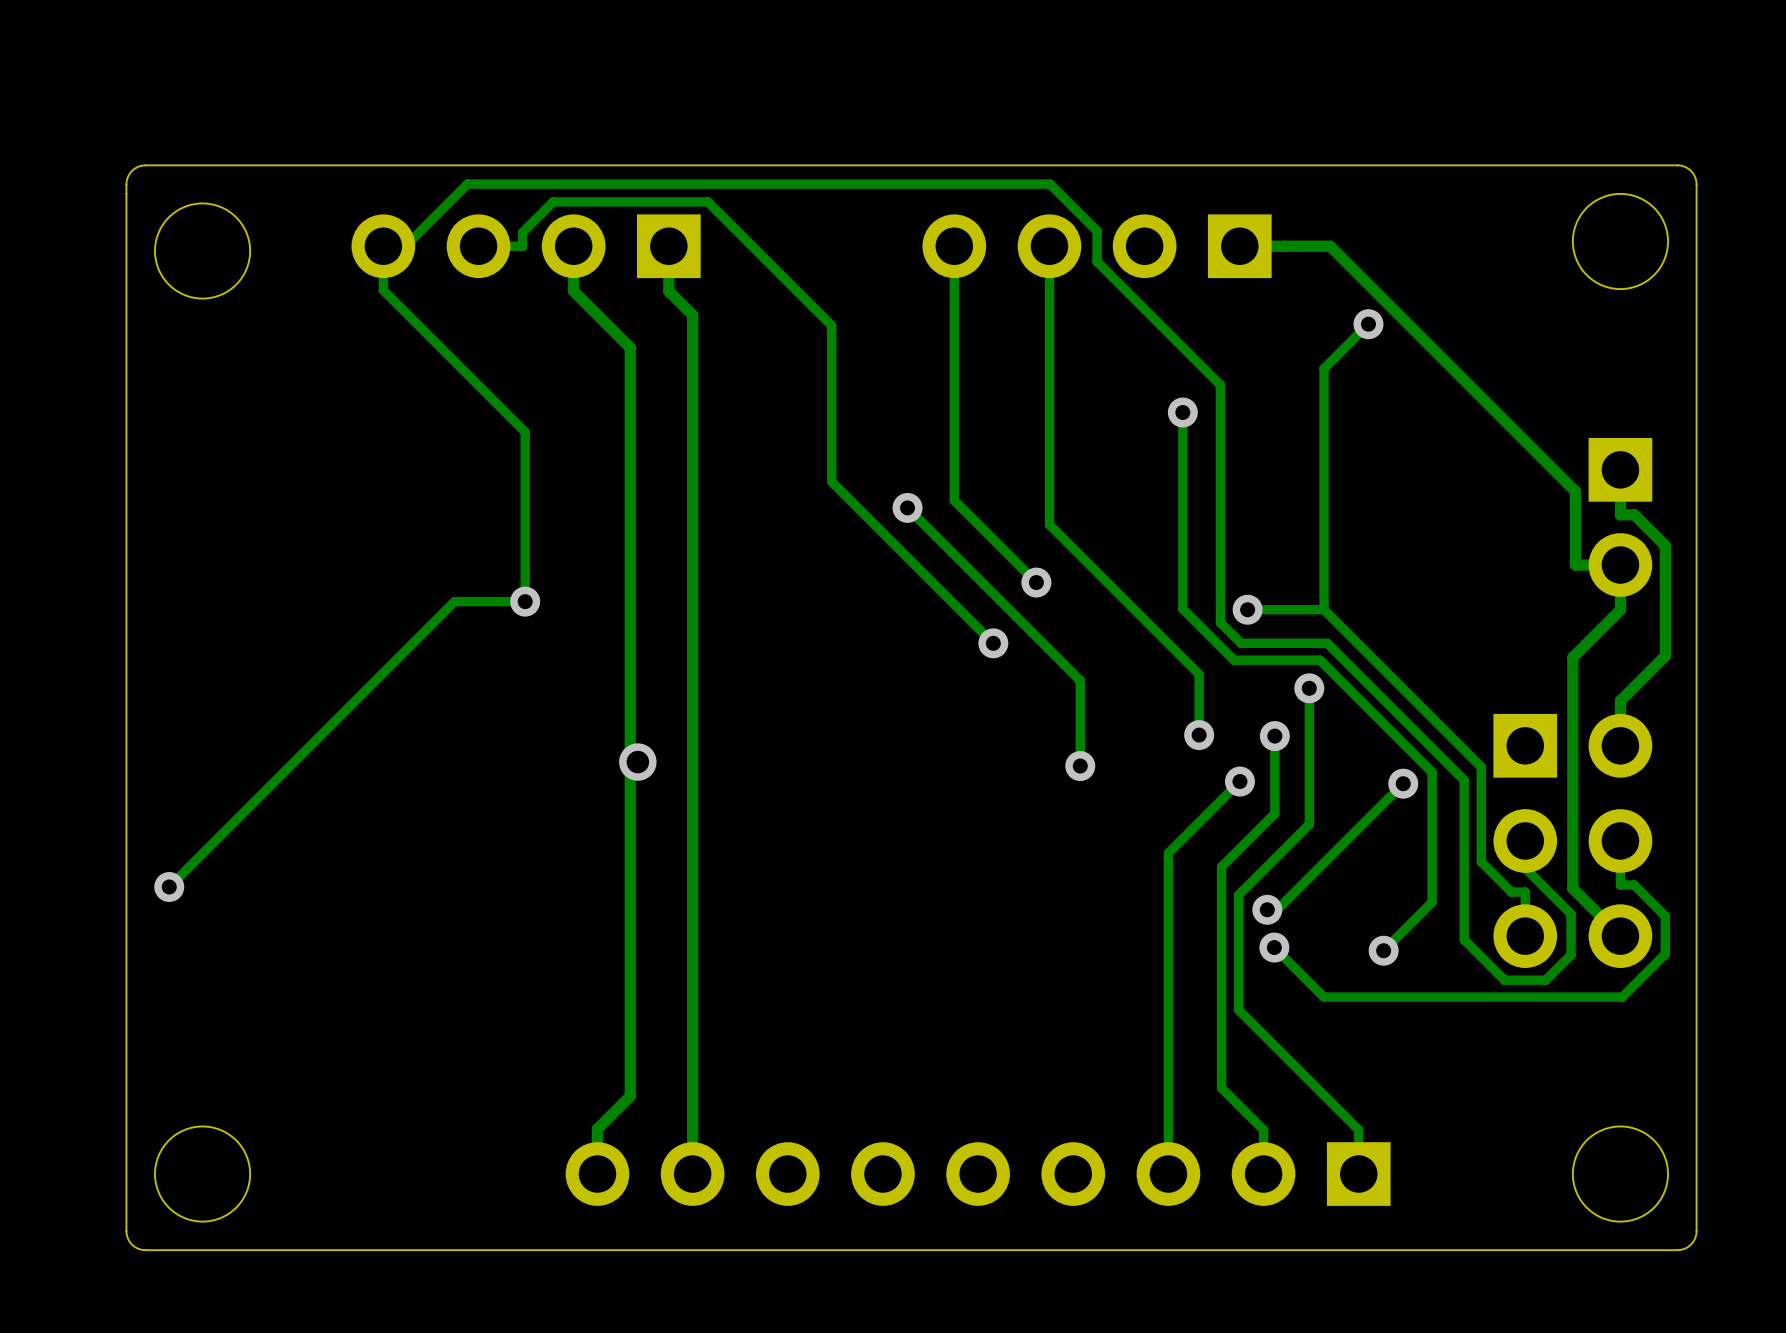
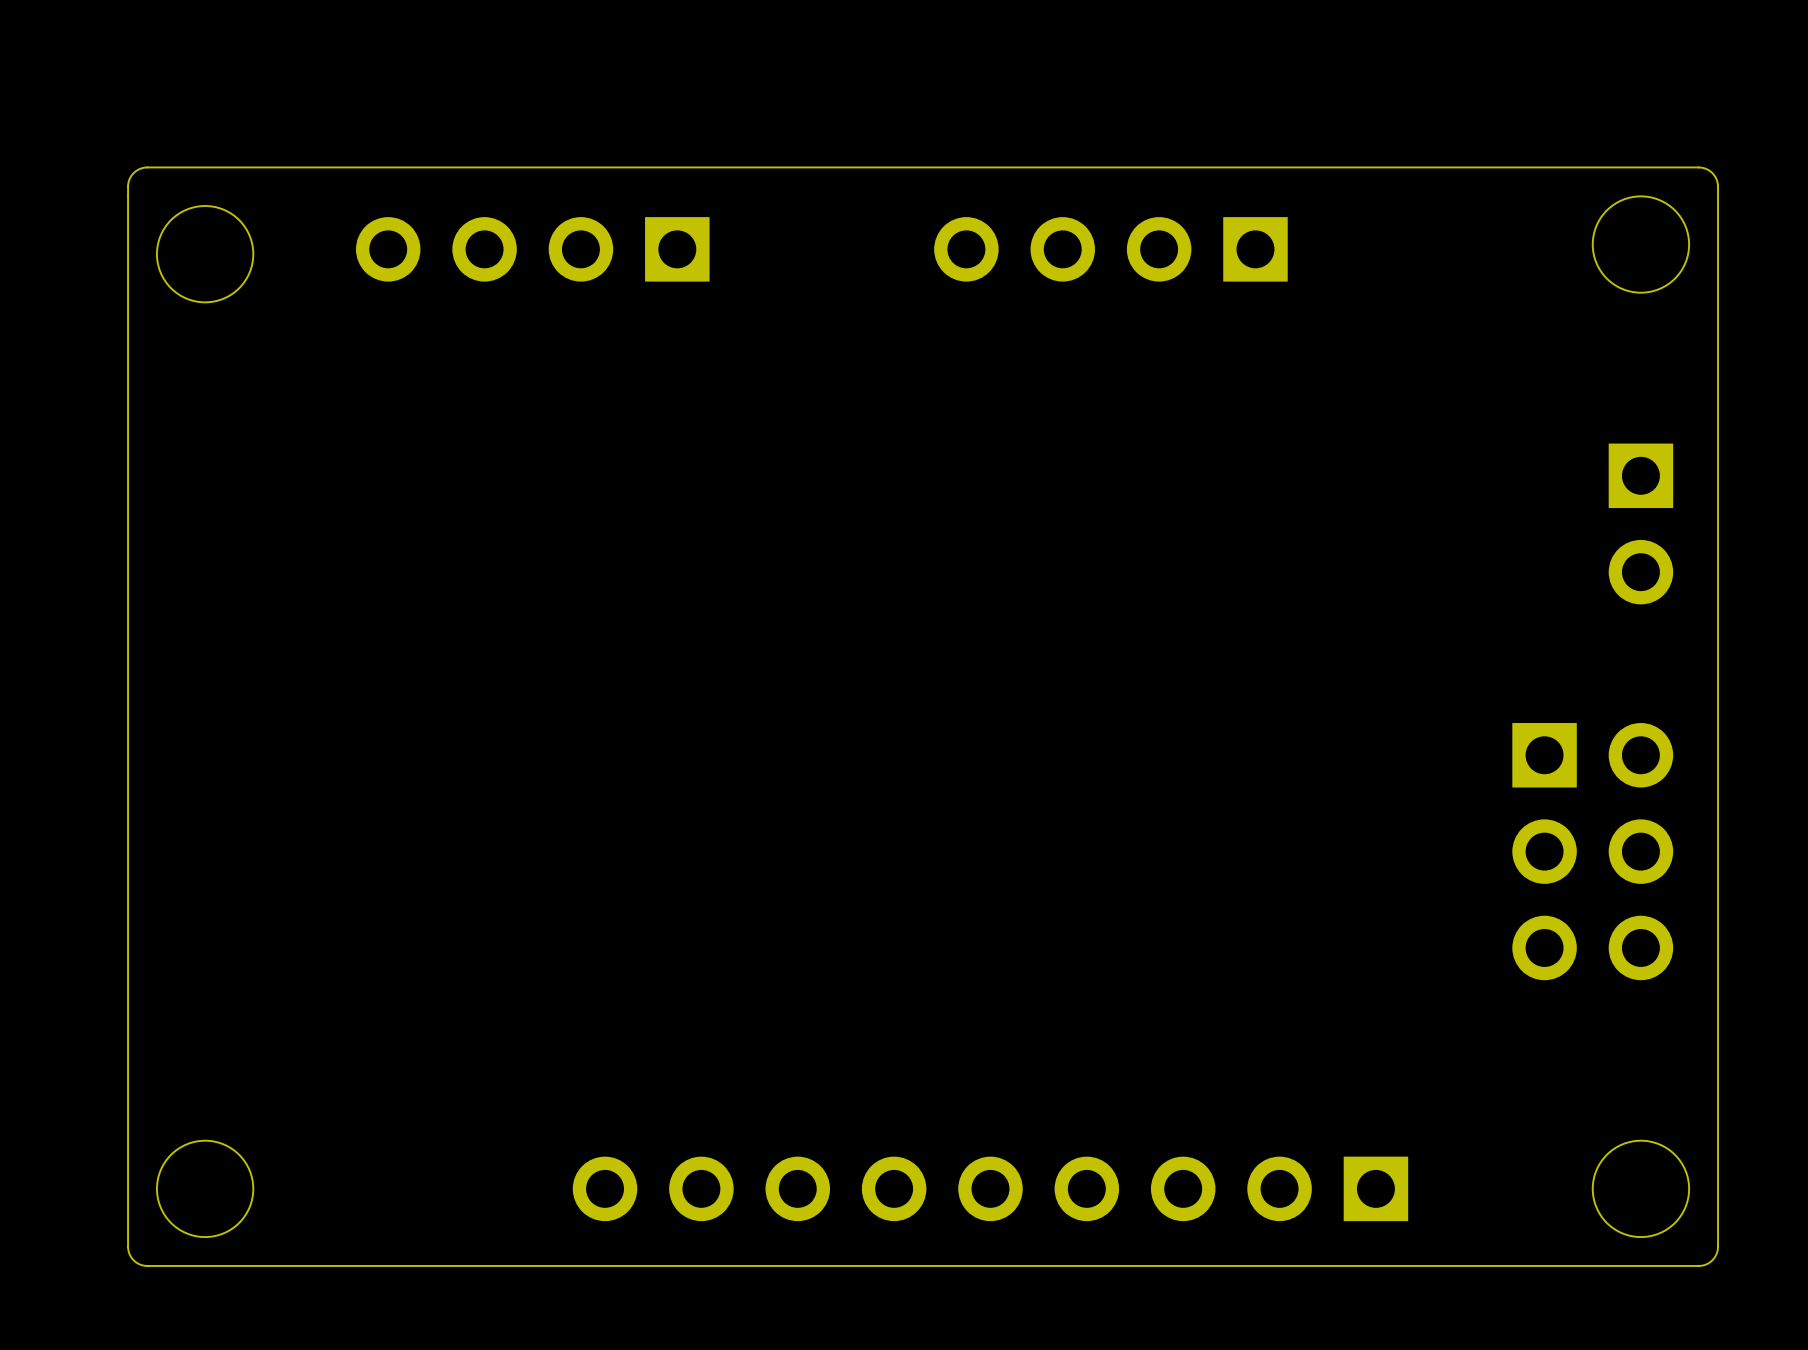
track: (383, 246) (383, 290) (525, 432) (525, 601) (454, 601) (169, 887) -> none
track: (478, 246) (522, 246) (522, 232) (553, 201) (707, 201) (831, 325) (831, 481) (993, 643) -> none
track: (573, 246) (573, 291) (630, 347) (630, 1096) (597, 1129) (597, 1174) -> none
track: (668, 246) (668, 291) (692, 314) (692, 1174) -> none
track: (954, 246) (954, 500) (1036, 582) -> none
track: (1049, 246) (1049, 524) (1199, 674) (1199, 735) -> none
track: (1239, 246) (1330, 246) (1575, 491) (1575, 565) (1620, 565) (1620, 609) (1572, 657) (1572, 888) (1620, 936) -> none
track: (383, 268) (467, 184) (1050, 184) (1097, 231) (1097, 261) (1220, 385) (1220, 622) (1241, 643) (1327, 643) (1464, 780) (1464, 939) (1504, 980) (1545, 980) (1571, 954) (1571, 914) (1525, 868) (1525, 840) -> none
track: (1368, 324) (1324, 368) (1324, 609) -> none
via: (1368, 324) -> none
track: (1182, 412) (1182, 608) (1234, 660) (1319, 660) (1432, 772) (1432, 902) (1383, 950) -> none
via: (1182, 412) -> none
track: (1620, 469) (1620, 514) (1634, 514) (1665, 545) (1665, 655) (1620, 700) (1620, 745) -> none
track: (907, 507) (1080, 680) (1080, 766) -> none
via: (907, 507) -> none
via: (1036, 582) -> none
via: (525, 601) -> none
via: (1247, 609) -> none
track: (1324, 609) (1481, 766) (1481, 861) (1511, 892) (1525, 892) (1525, 936) -> none
track: (1324, 609) (1247, 609) -> none
via: (993, 643) -> none
track: (1309, 688) (1309, 824) (1238, 895) (1238, 1010) (1358, 1130) (1358, 1174) -> none
via: (1309, 688) -> none
via: (1199, 735) -> none
track: (1274, 736) (1274, 813) (1221, 866) (1221, 1087) (1263, 1130) (1263, 1174) -> none
via: (1274, 736) -> none
via: (637, 762) -> none
via: (1080, 766) -> none
track: (1239, 781) (1168, 853) (1168, 1174) -> none
via: (1239, 781) -> none
track: (1403, 783) (1277, 909) (1267, 909) -> none
via: (1403, 783) -> none
track: (1620, 840) (1620, 885) (1634, 885) (1665, 916) (1665, 954) (1622, 997) (1323, 997) (1274, 947) -> none
via: (169, 887) -> none
via: (1267, 909) -> none
via: (1274, 947) -> none
via: (1383, 950) -> none

